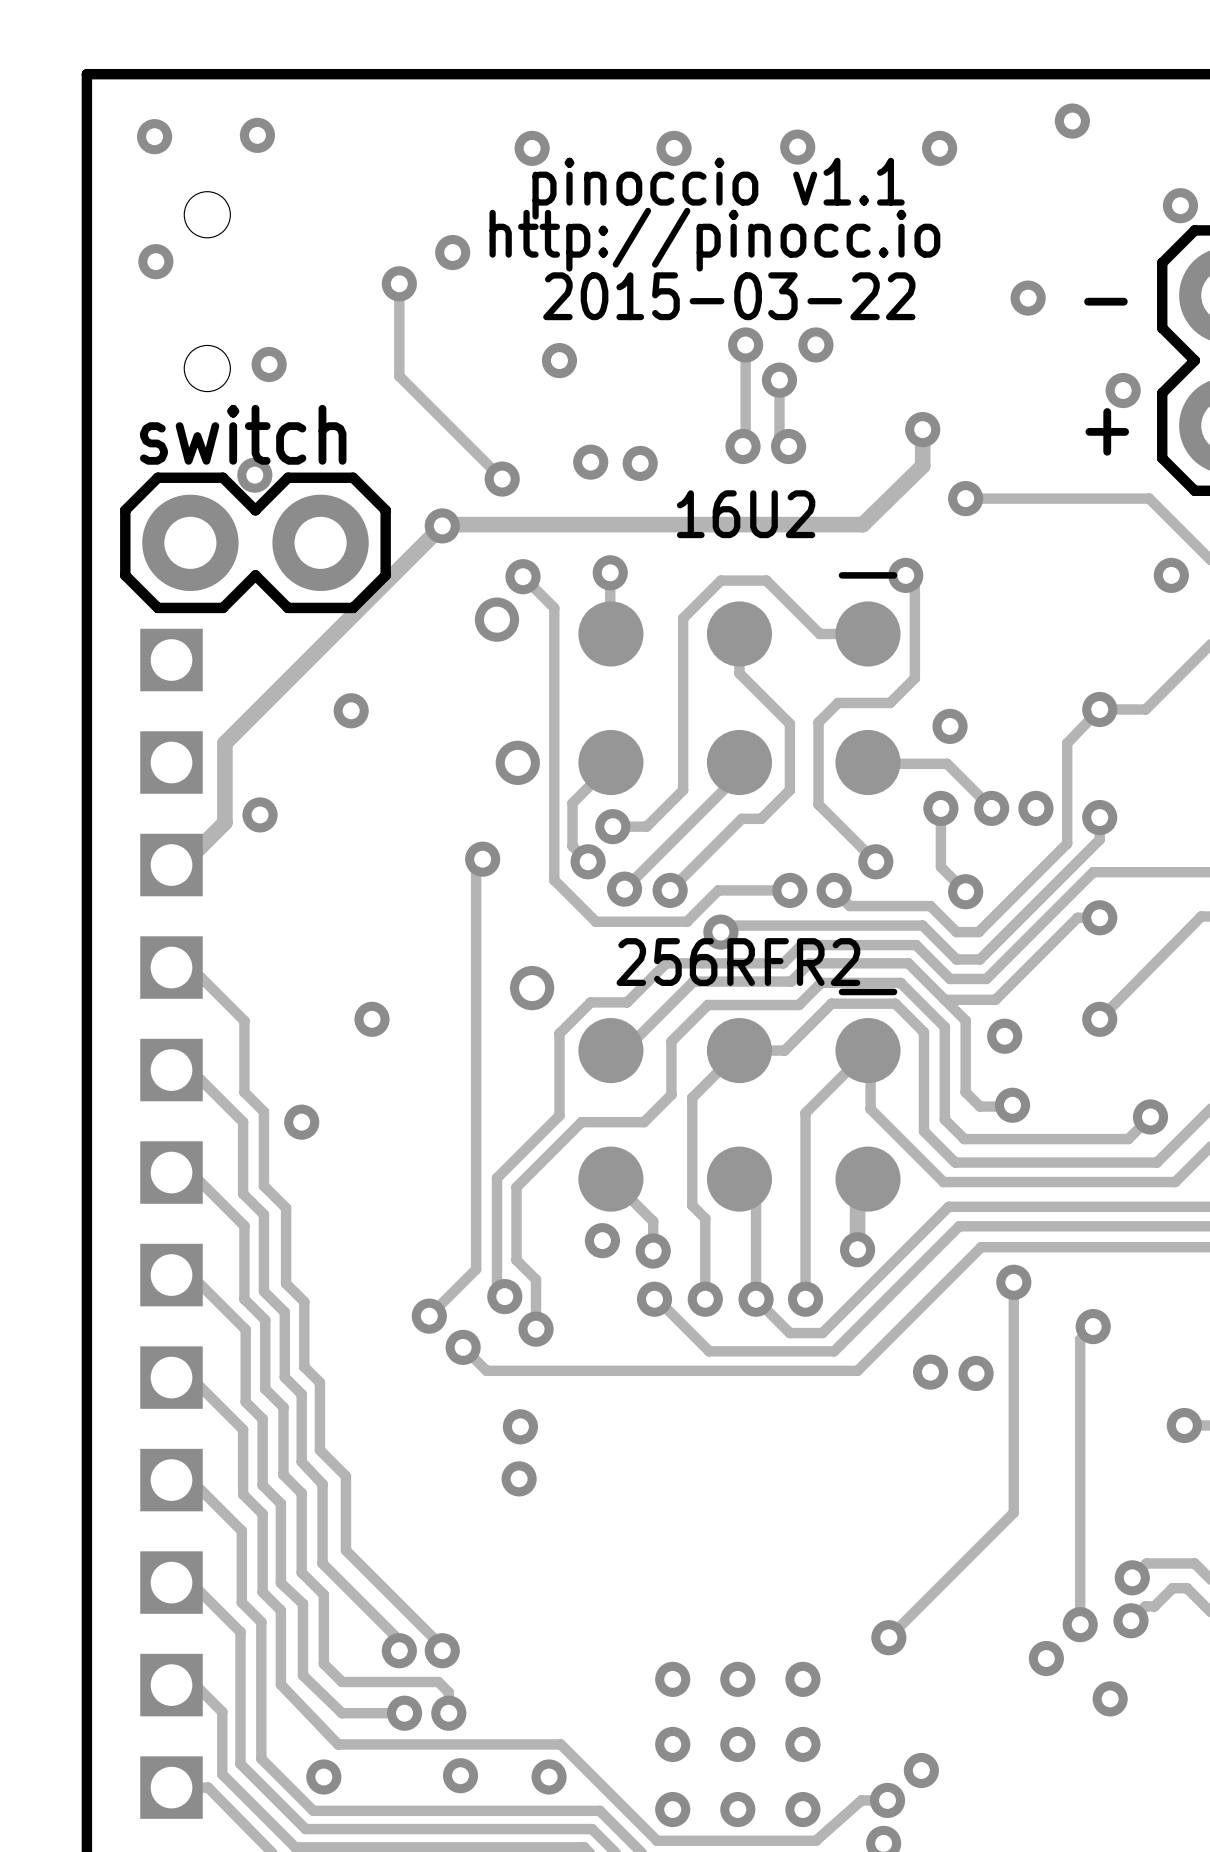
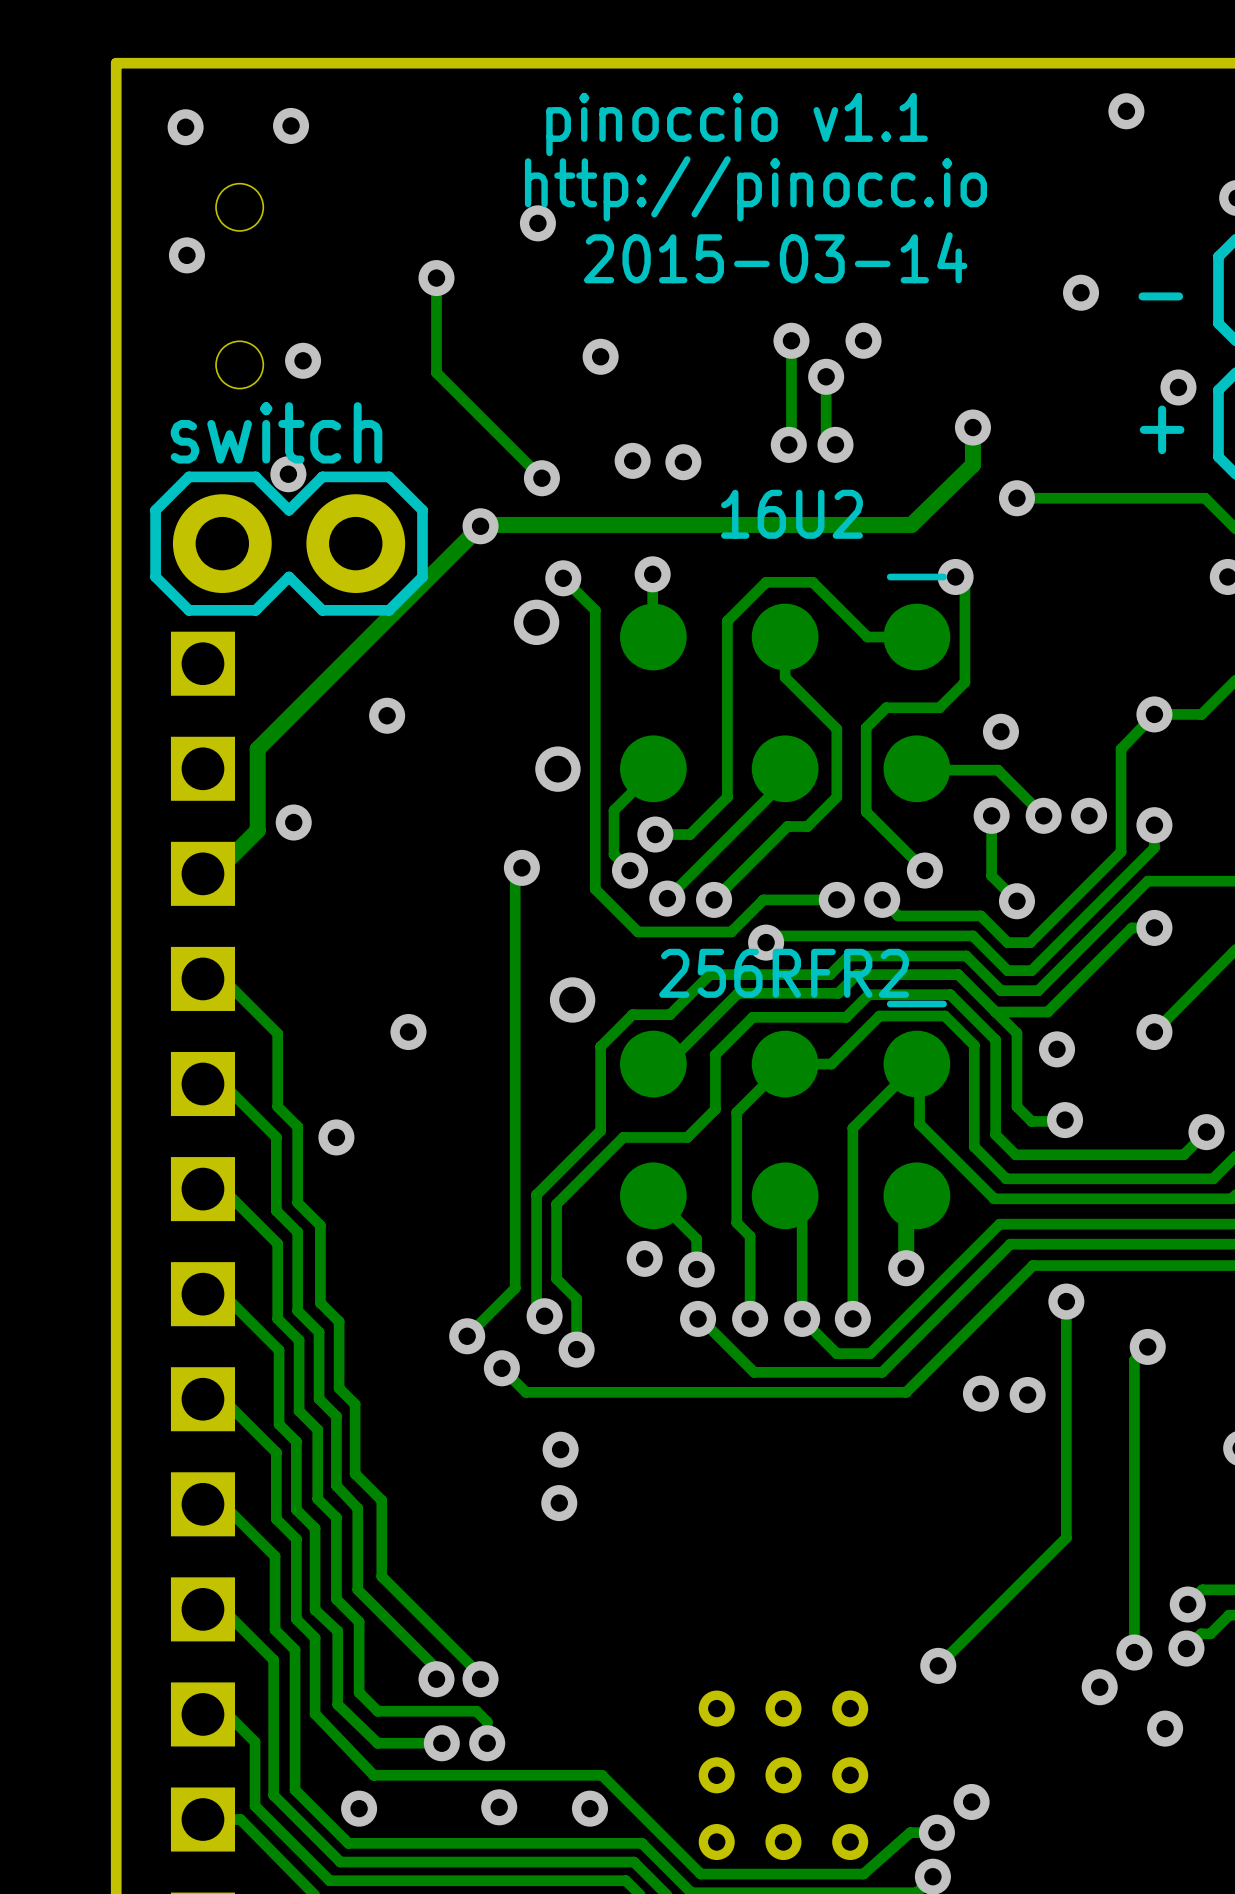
via: (797, 147) -> none
via: (532, 148) -> none
via: (674, 148) -> none
via: (939, 148) -> none
text position: pinoccio v1.1 (718, 188) -> pinoccio v1.1 (737, 124)
via: none -> (537, 223)
text position: http://pinocc.io (714, 239) -> http://pinocc.io (755, 188)
via: (452, 252) -> none
text: 2015-03-22 (729, 296) -> 2015-03-14 (775, 257)

